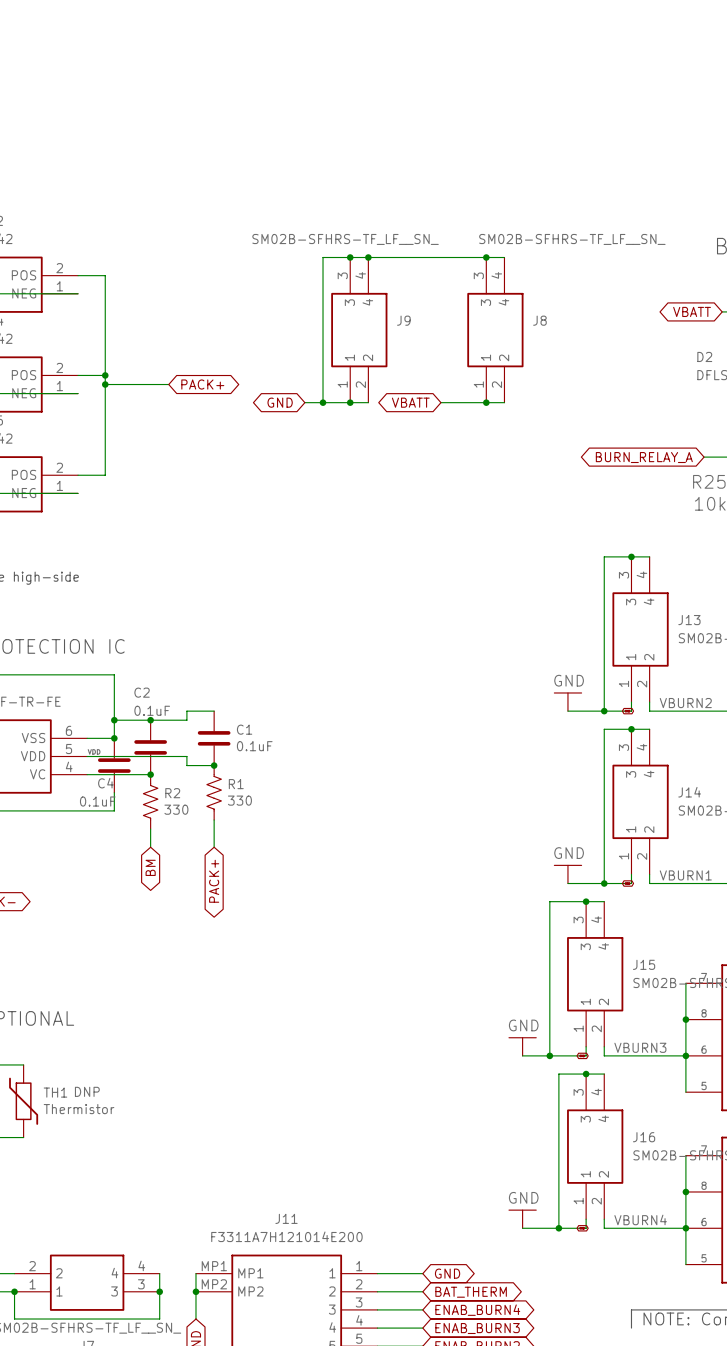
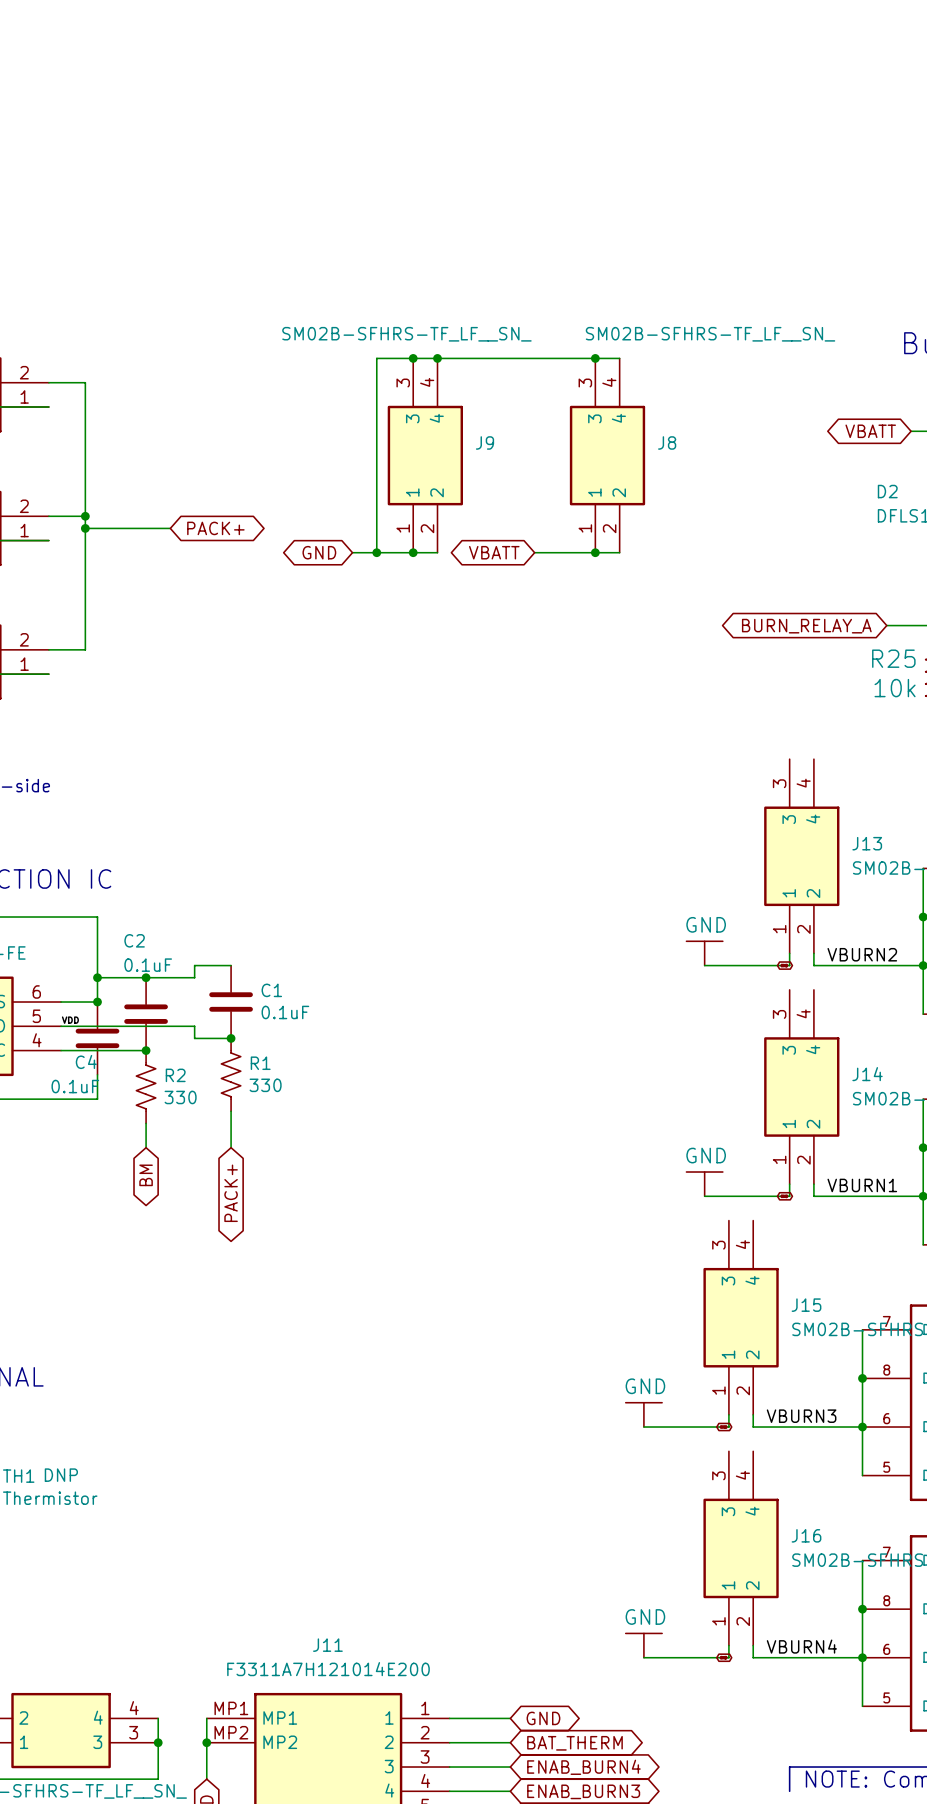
junction: (631, 556) -> none
wire: (649, 556) (604, 556) (604, 711) -> none
junction: (604, 711) -> none
junction: (631, 729) -> none
wire: (649, 729) (604, 729) (604, 883) -> none
junction: (604, 883) -> none
junction: (586, 901) -> none
wire: (604, 901) (549, 901) (549, 1055) -> none
junction: (549, 1055) -> none
junction: (586, 1074) -> none
wire: (604, 1074) (558, 1074) (558, 1228) -> none
junction: (558, 1228) -> none

